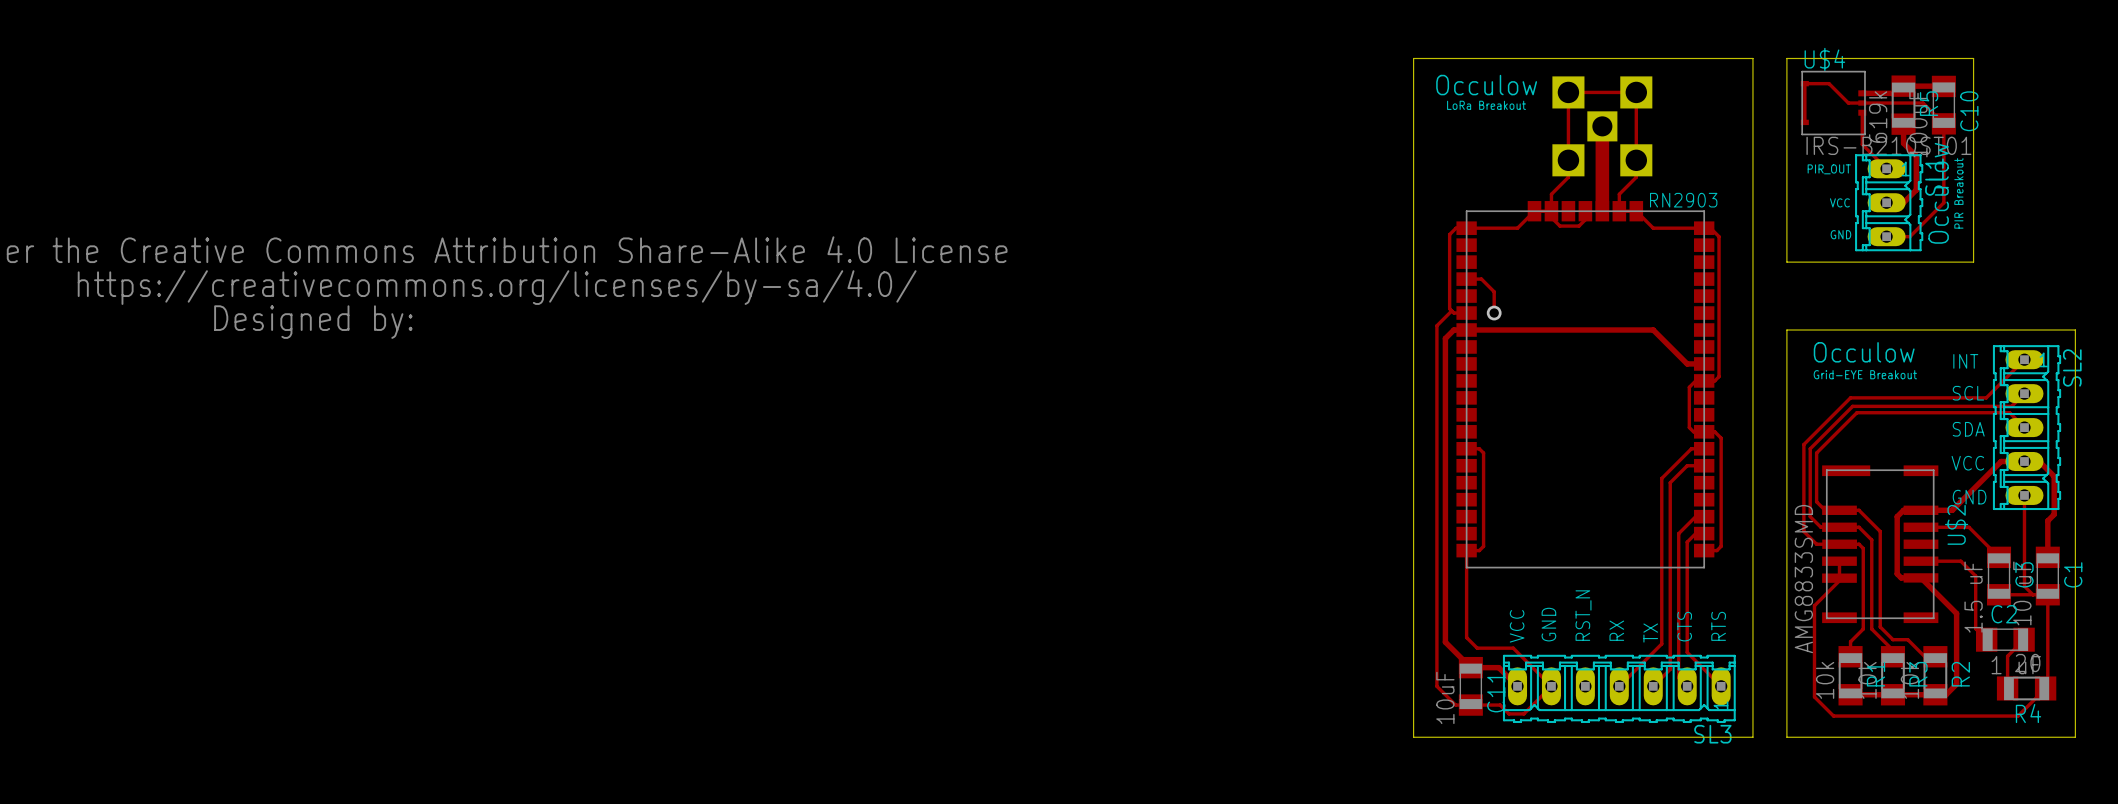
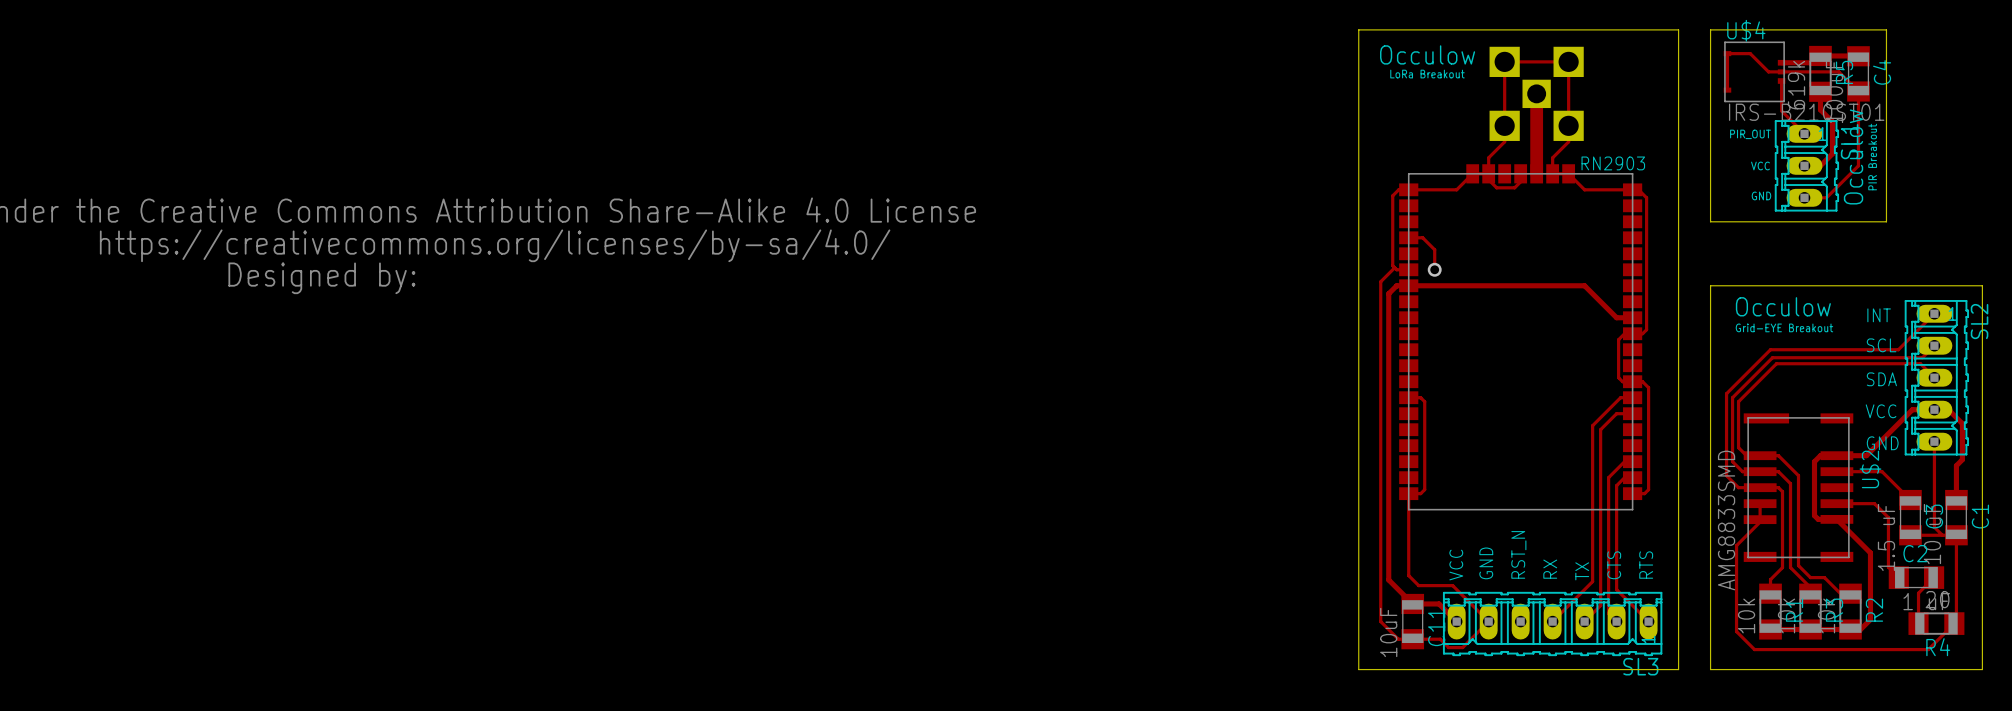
C10 name: C10 (1969, 111) -> C4 (1882, 72)

